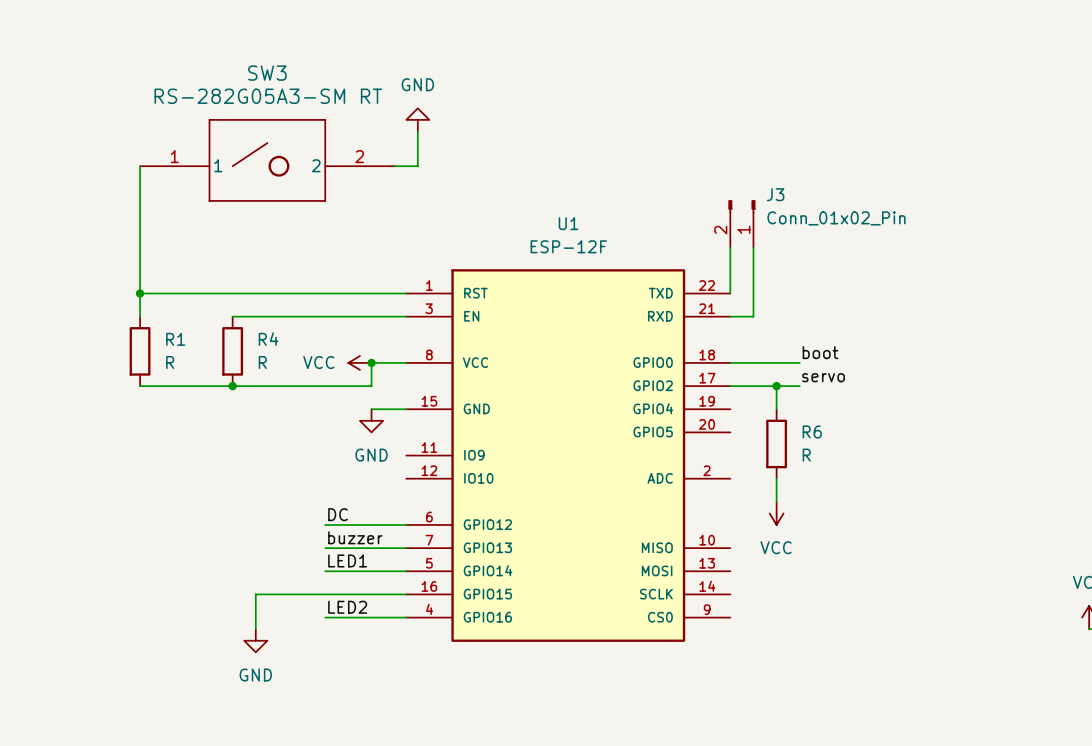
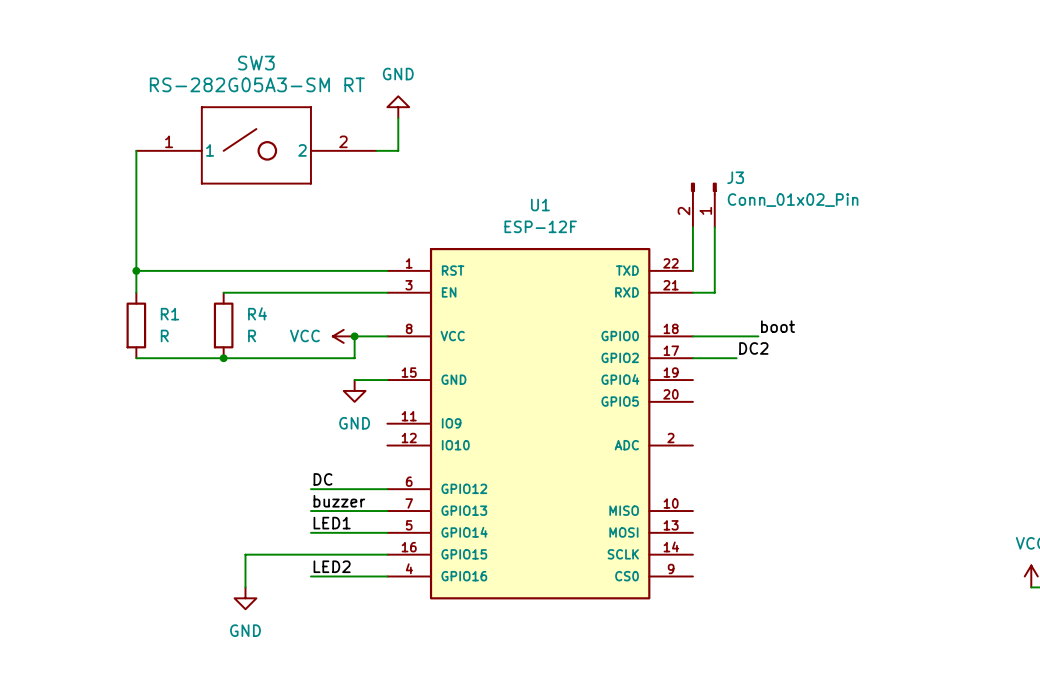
label: none -> DC2 (753, 348)
label: servo (823, 377) -> none
junction: (776, 386) -> none
wire: (799, 386) (776, 386) (776, 409) -> none
R6: R (776, 443) -> none
wire: (776, 478) (776, 501) -> none
power symbol: VCC (776, 513) -> none

